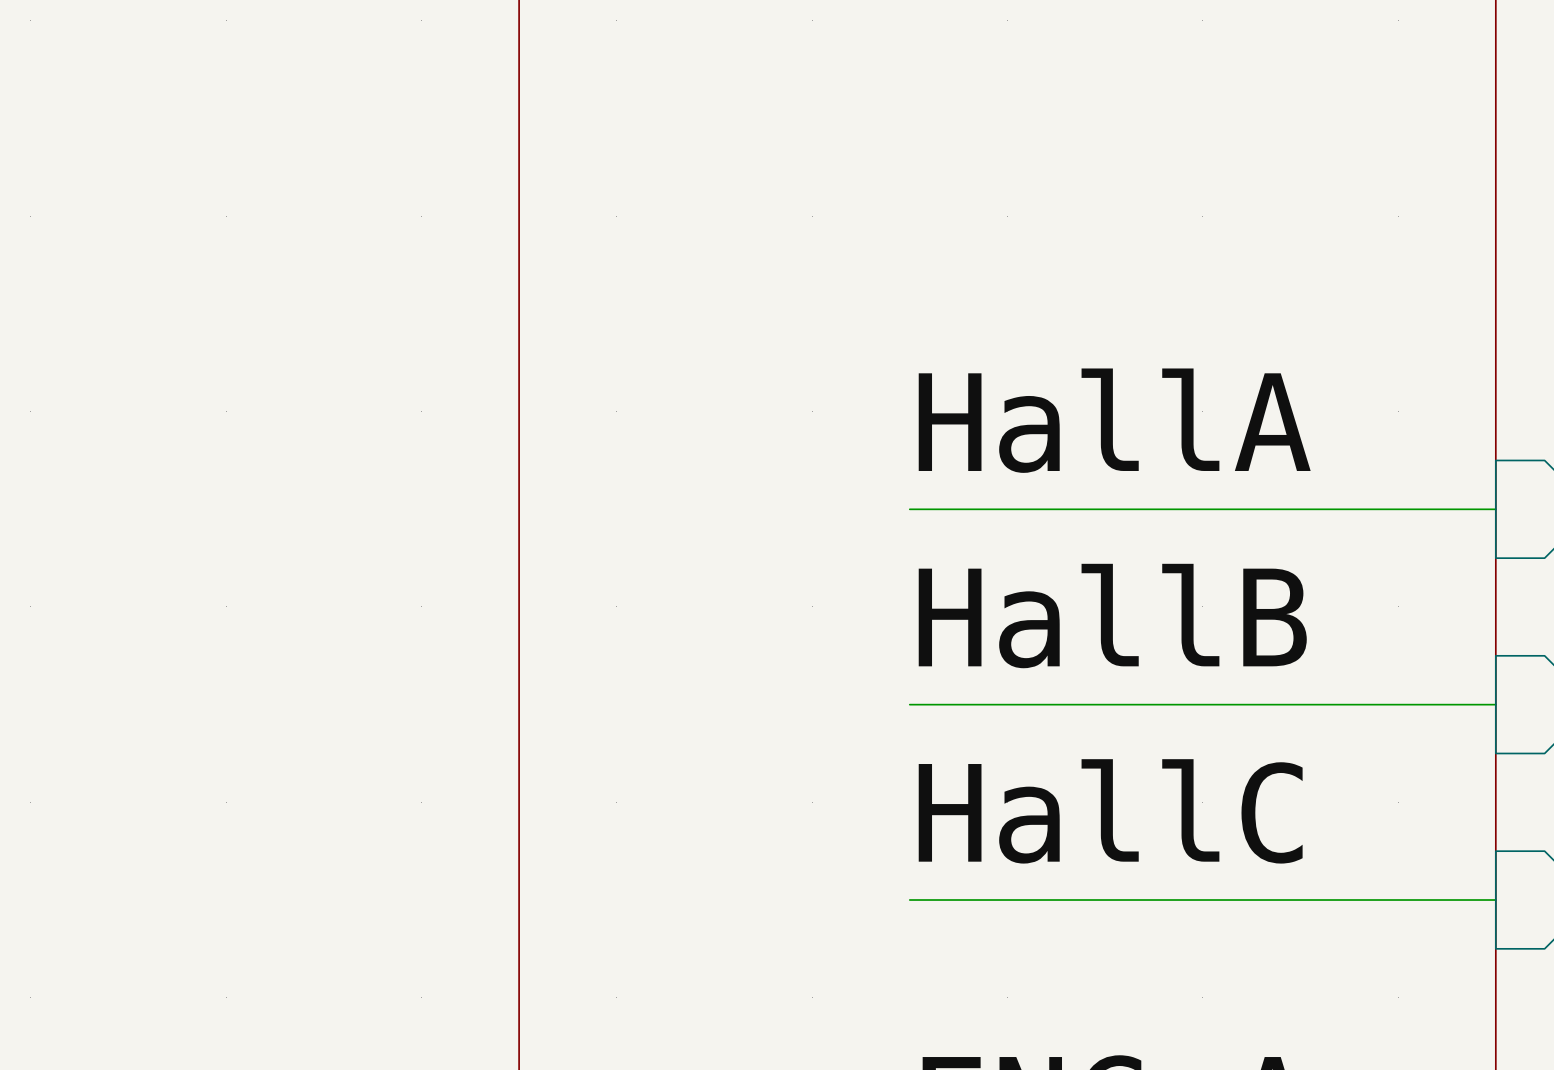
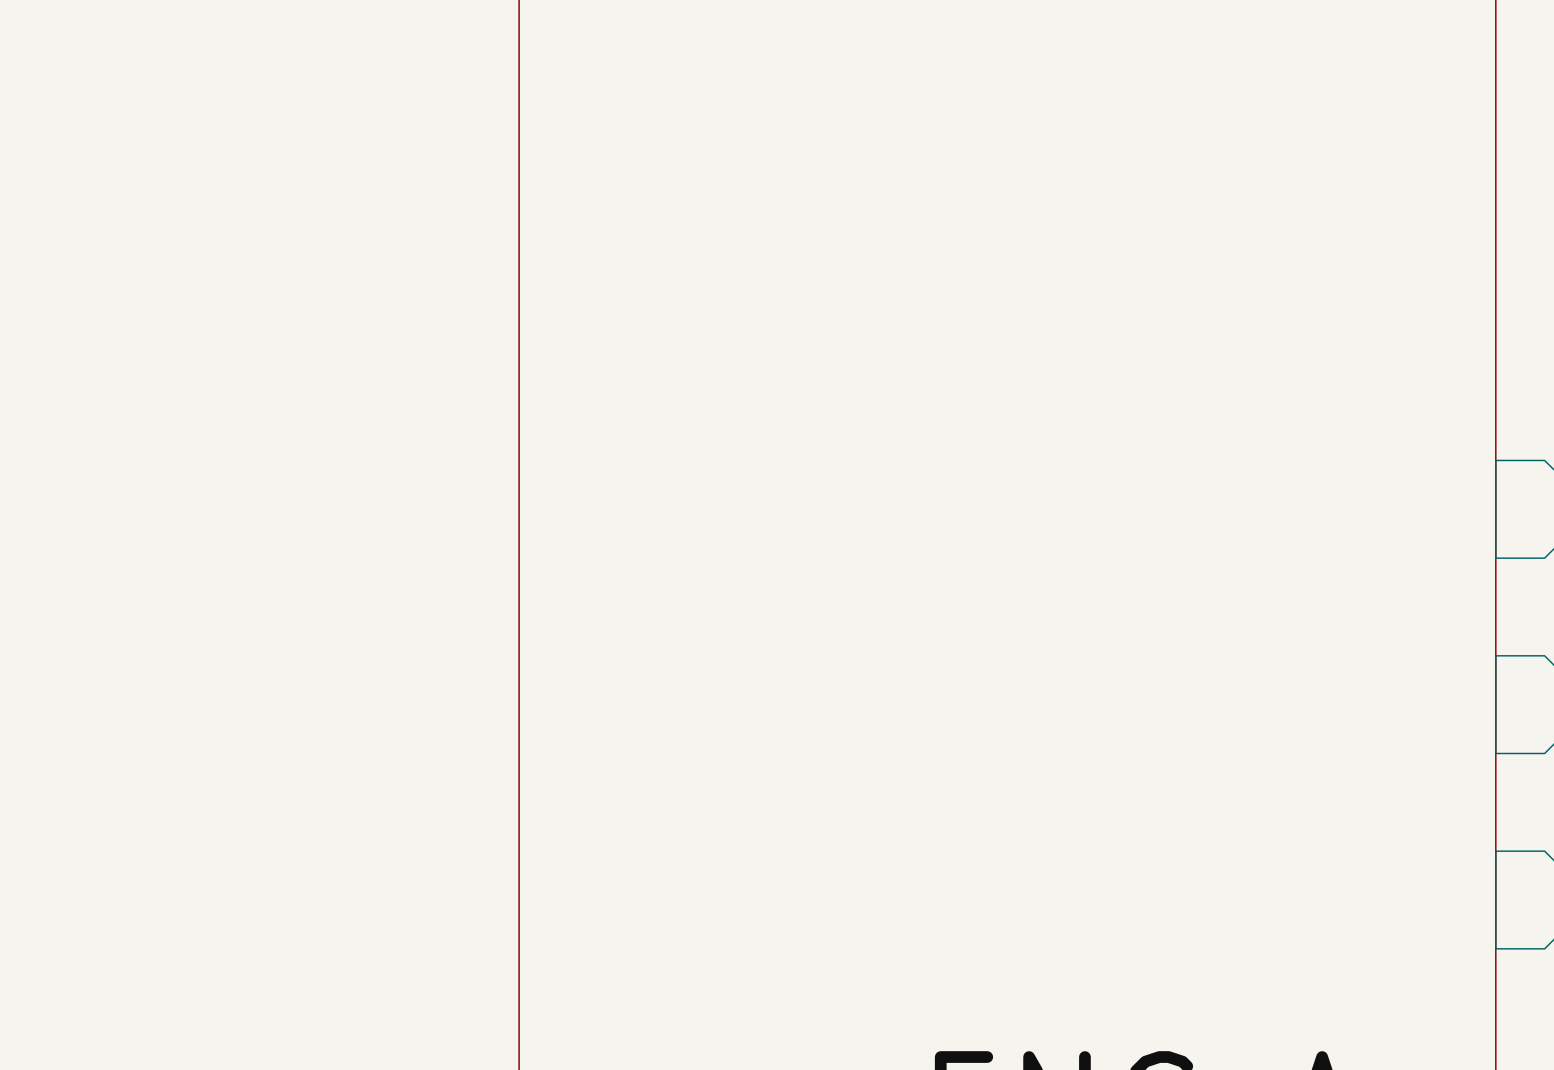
label: HallA (1114, 420) -> none
wire: (909, 509) (1495, 509) -> none
label: HallB (1112, 616) -> none
wire: (909, 704) (1495, 704) -> none
label: HallC (1110, 811) -> none
wire: (909, 900) (1495, 900) -> none

